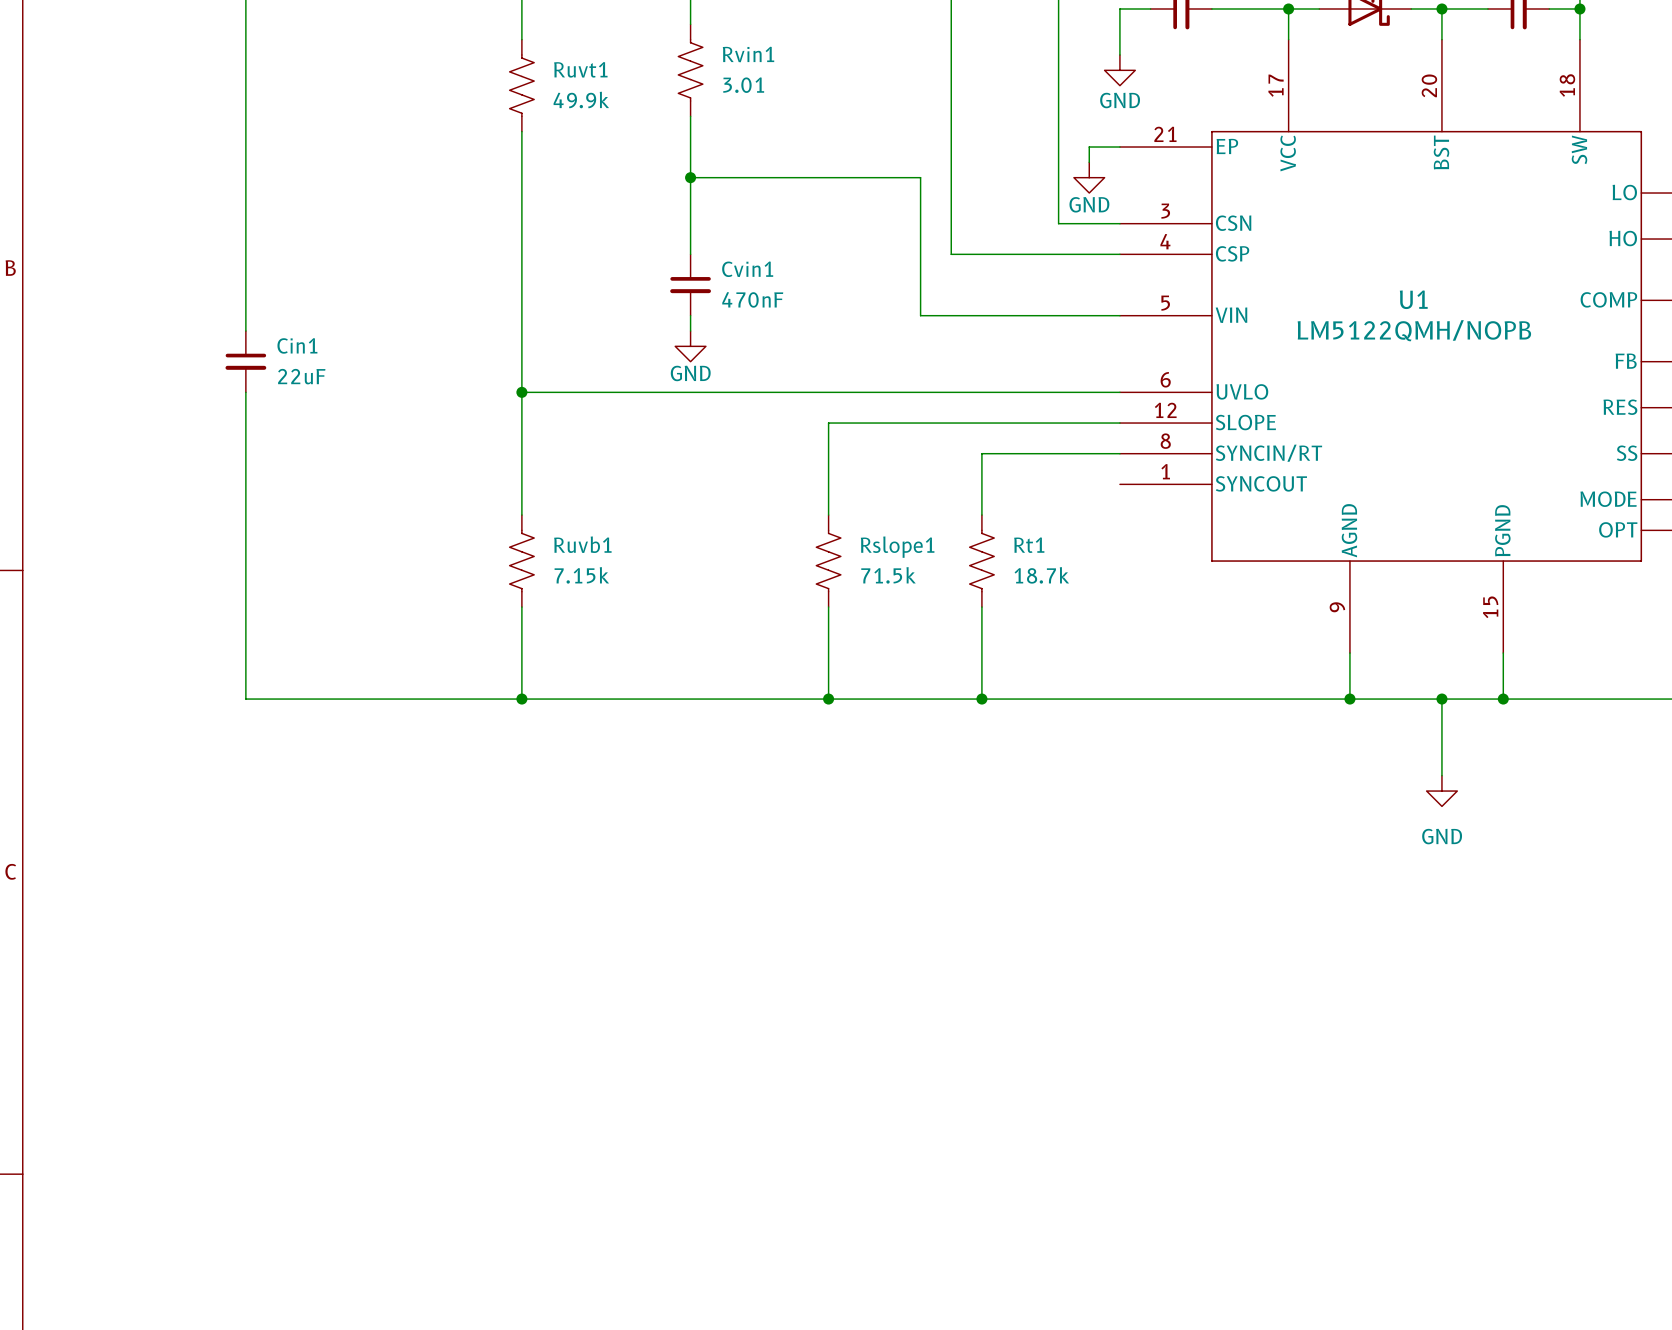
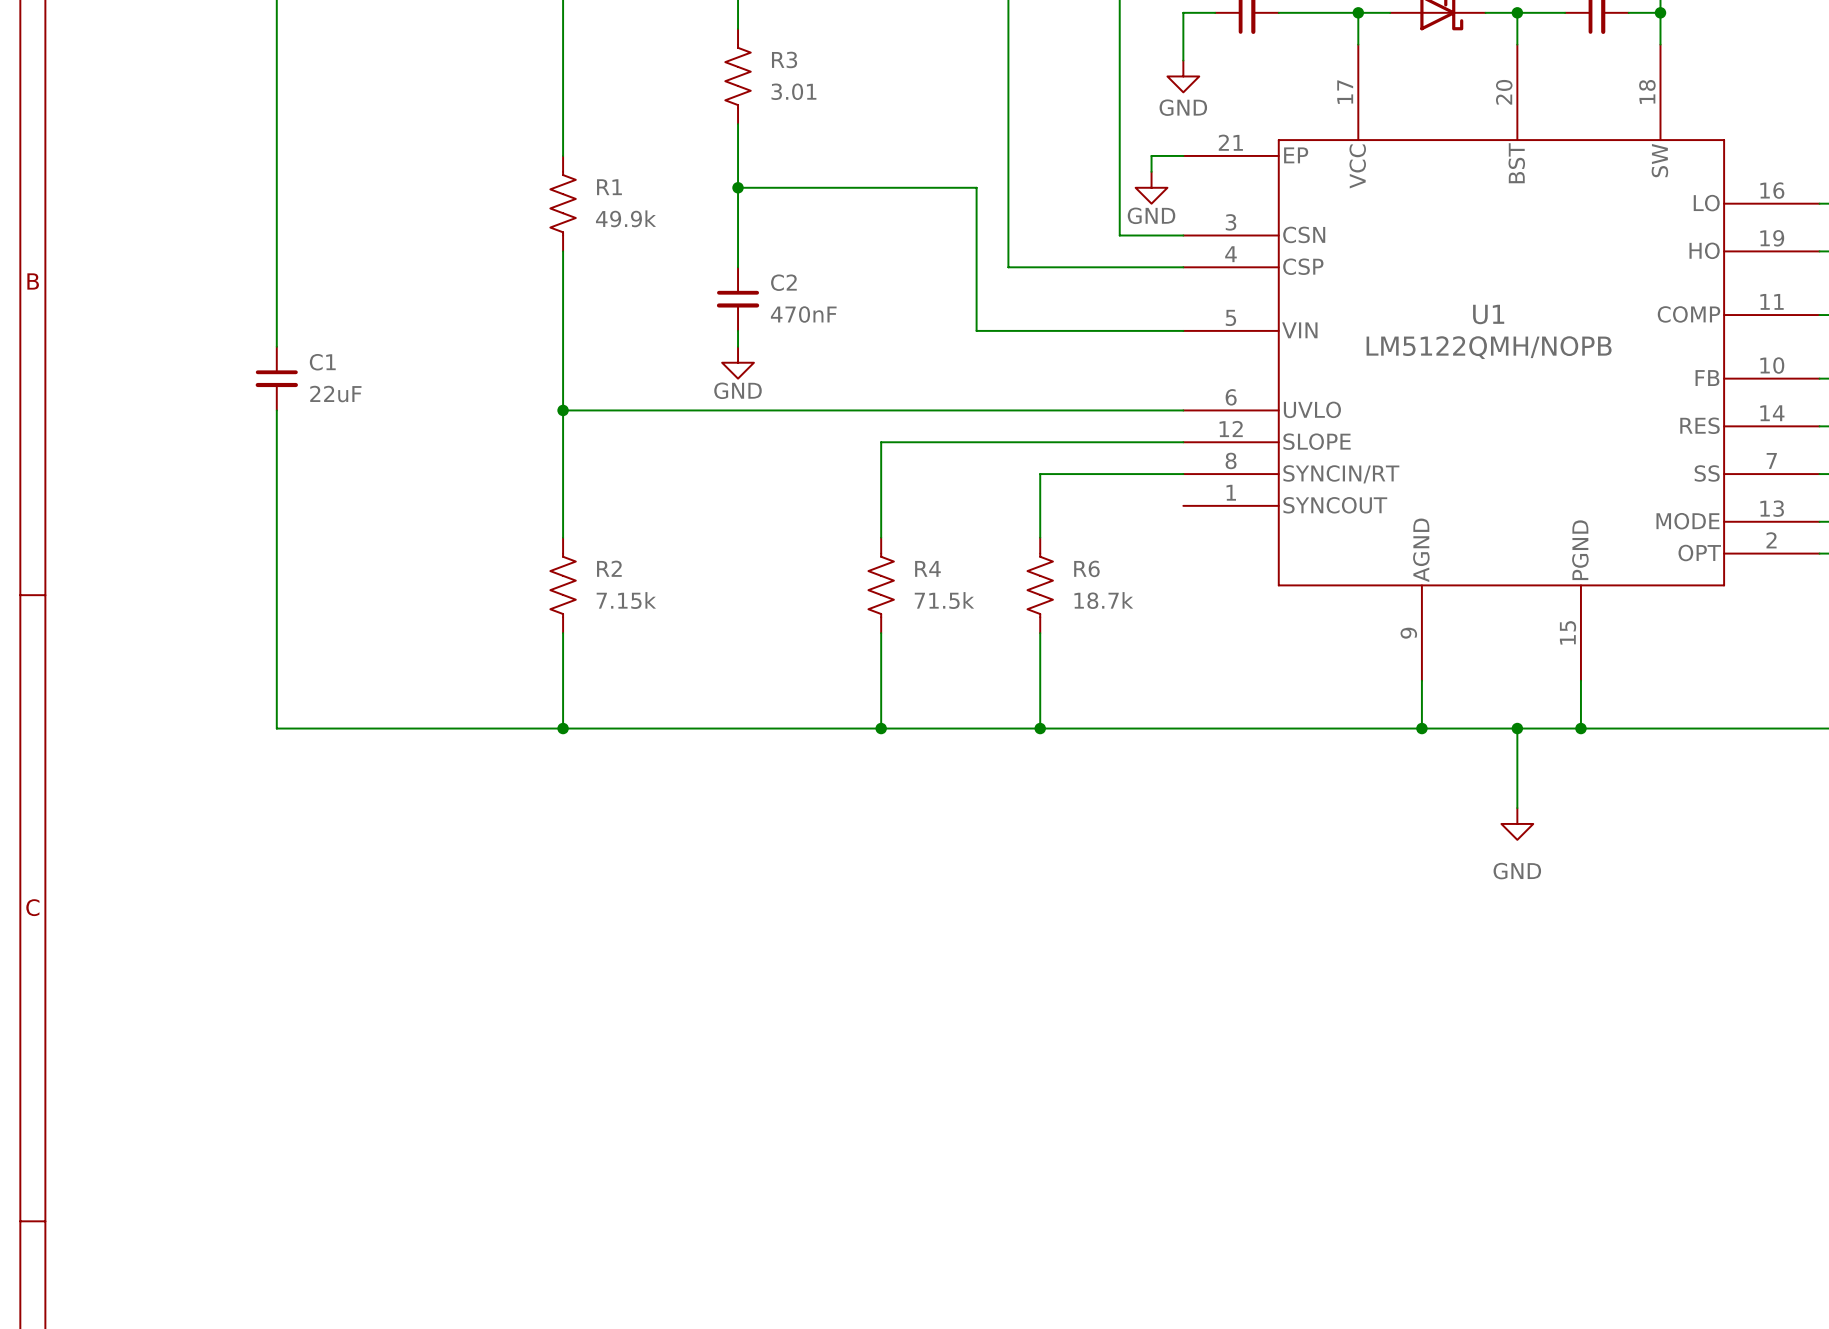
Rvin1 name: Rvin1 (748, 54) -> R3 (784, 59)
Ruvt1: 49.9k (521, 85) -> none
R1: none -> 49.9k (563, 203)
Cvin1 name: Cvin1 (747, 269) -> C2 (783, 282)
Cin1 name: Cin1 (297, 345) -> C1 (322, 362)
Ruvb1 name: Ruvb1 (582, 544) -> R2 (609, 568)
Rt1 name: Rt1 (1029, 545) -> R6 (1086, 568)
Rslope1 name: Rslope1 (897, 547) -> R4 (927, 568)

